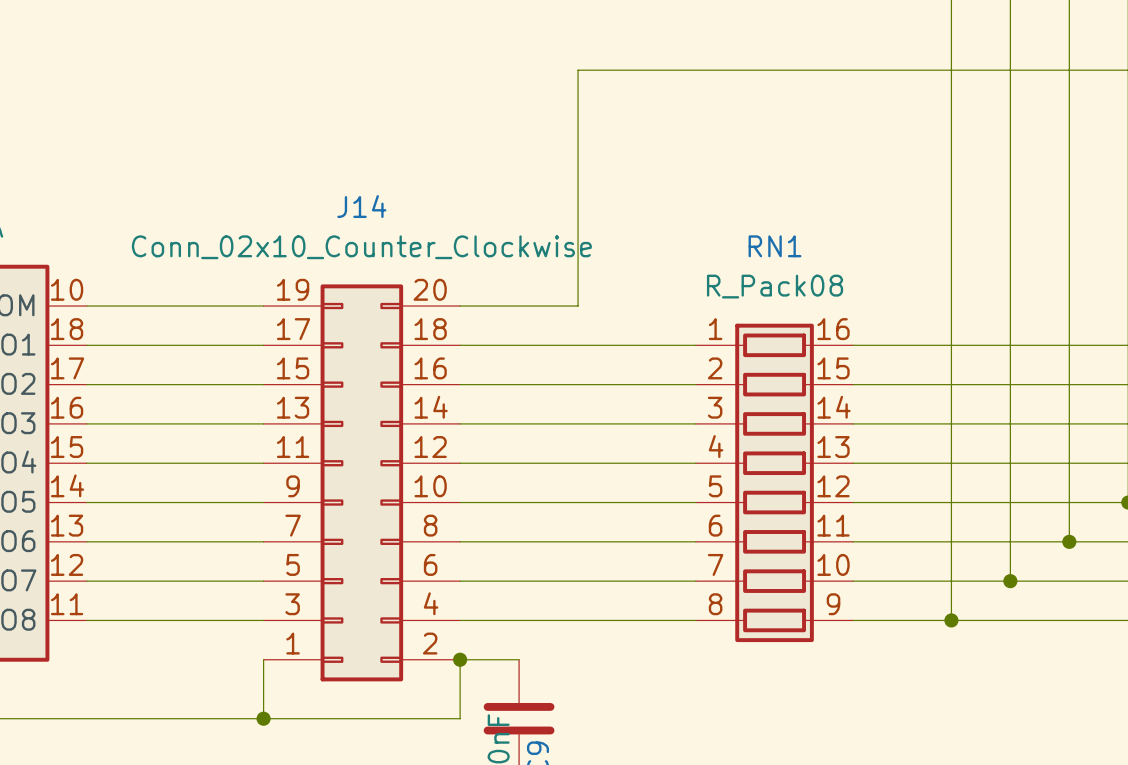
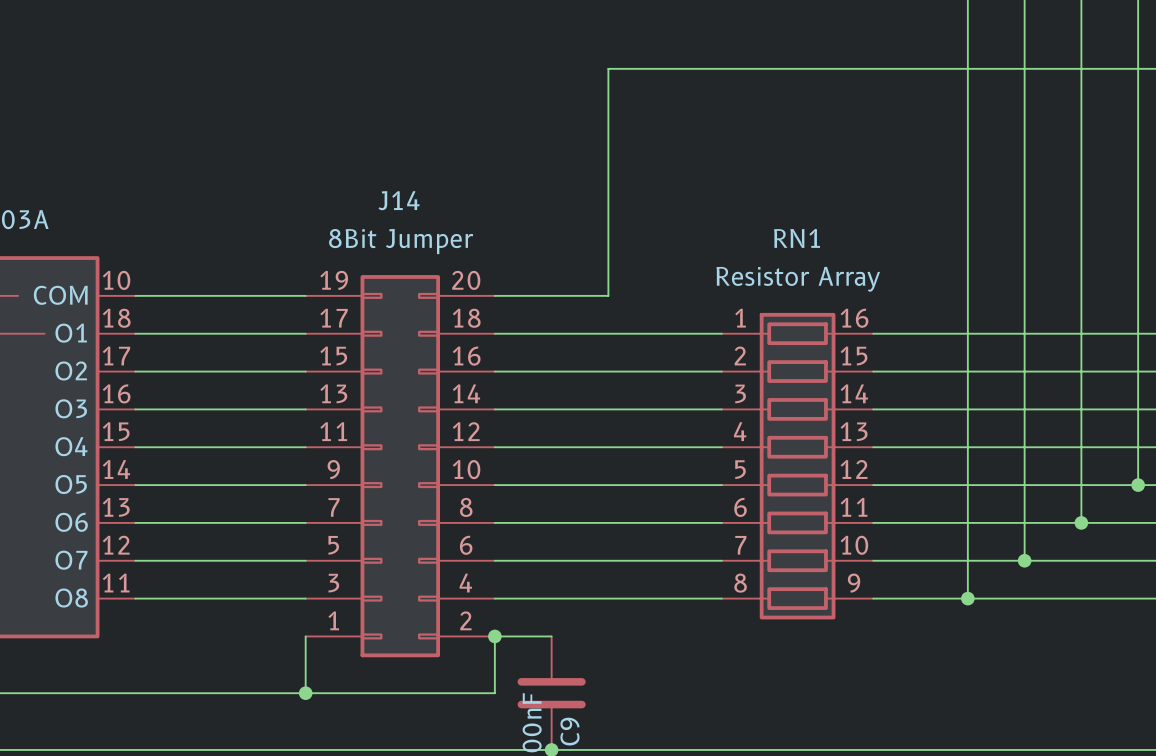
J14 value: Conn_02x10_Counter_Clockwise (361, 247) -> 8Bit Jumper (401, 241)
RN1 value: R_Pack08 (775, 286) -> Resistor Array (798, 279)

